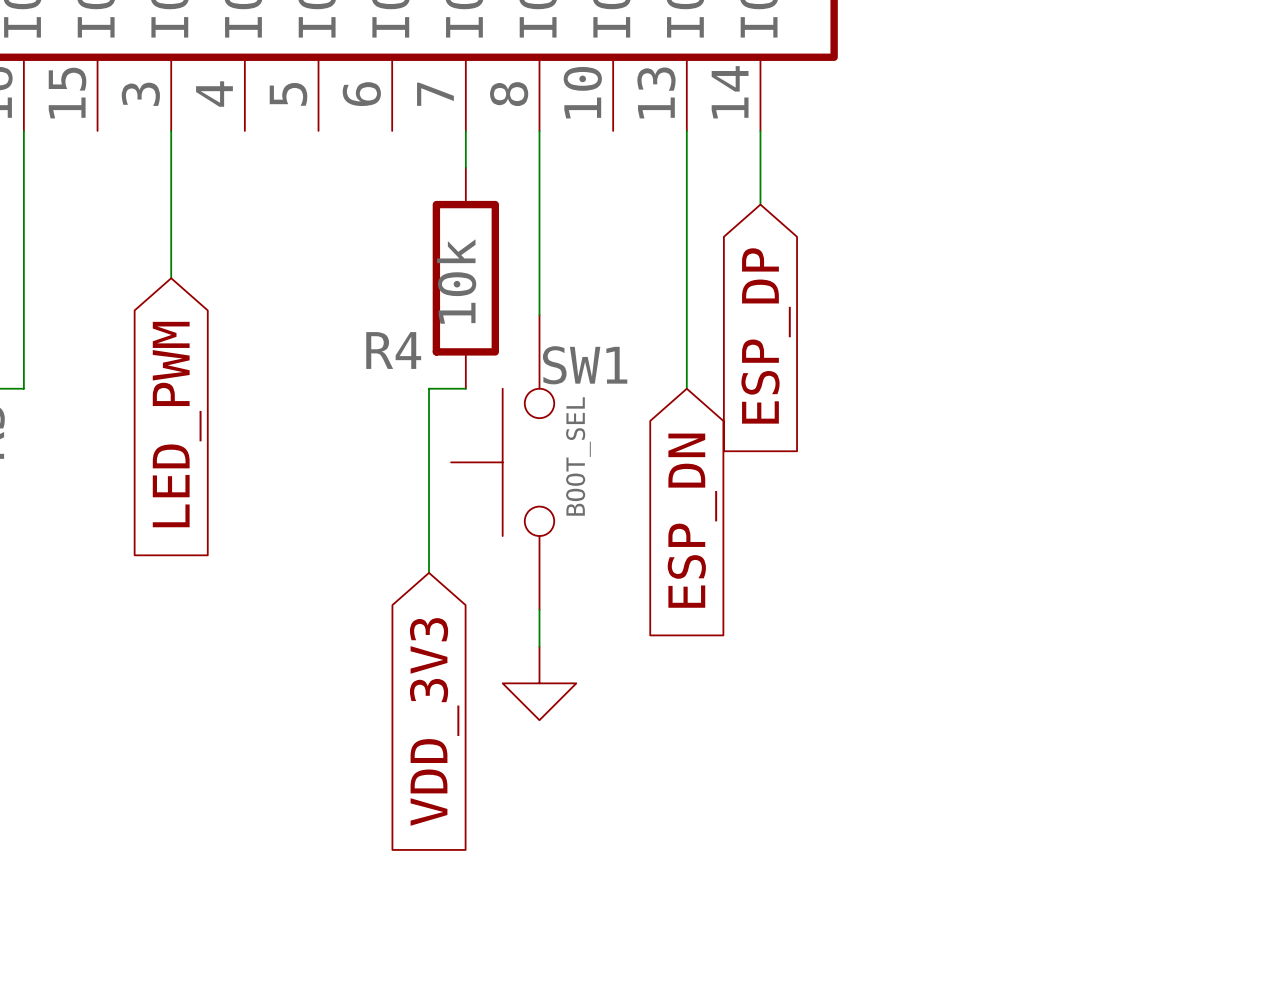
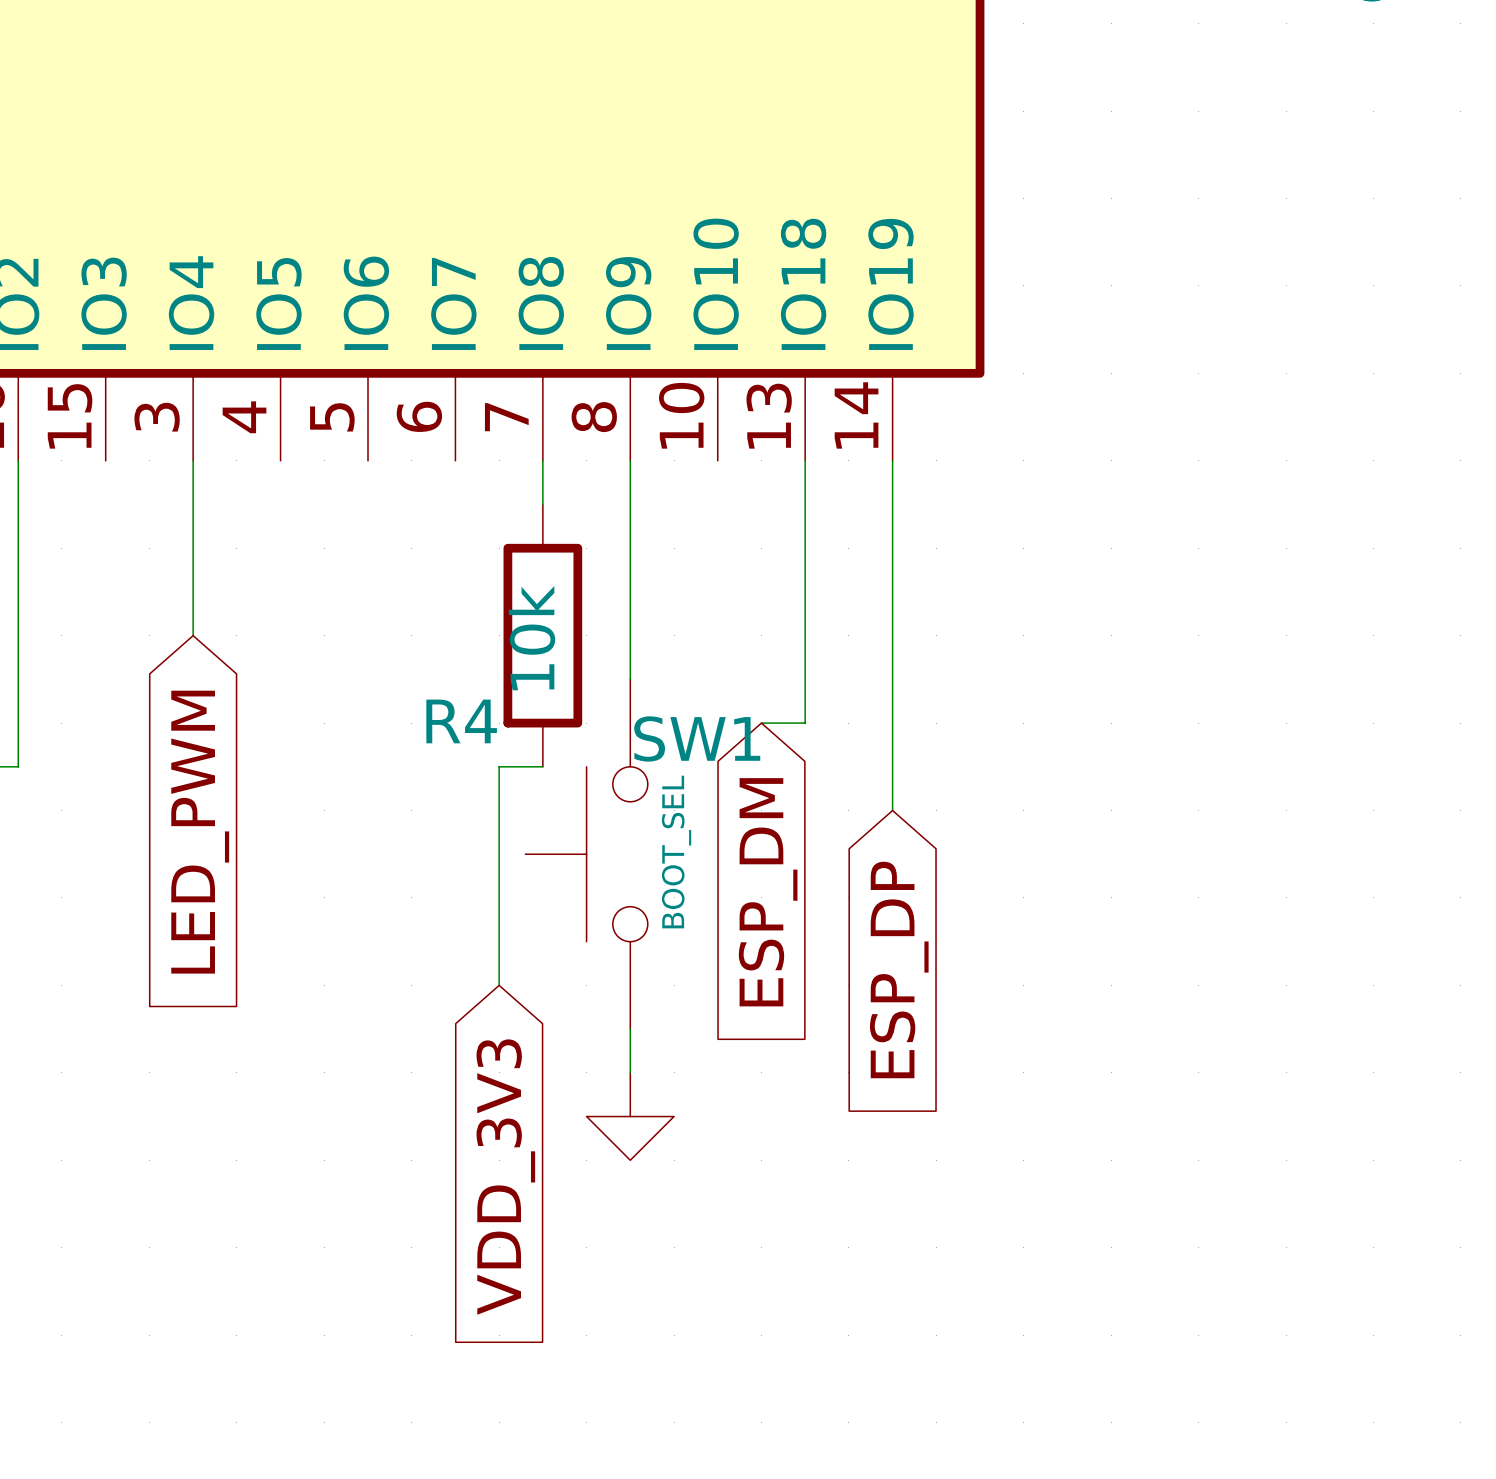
wire: none -> (892, 548) (892, 810)
global label position: ESP_DP (766, 335) -> ESP_DP (899, 970)
wire: (686, 351) (686, 388) -> (805, 723) (761, 723)
global label: ESP_DN (692, 520) -> ESP_DM (768, 892)

